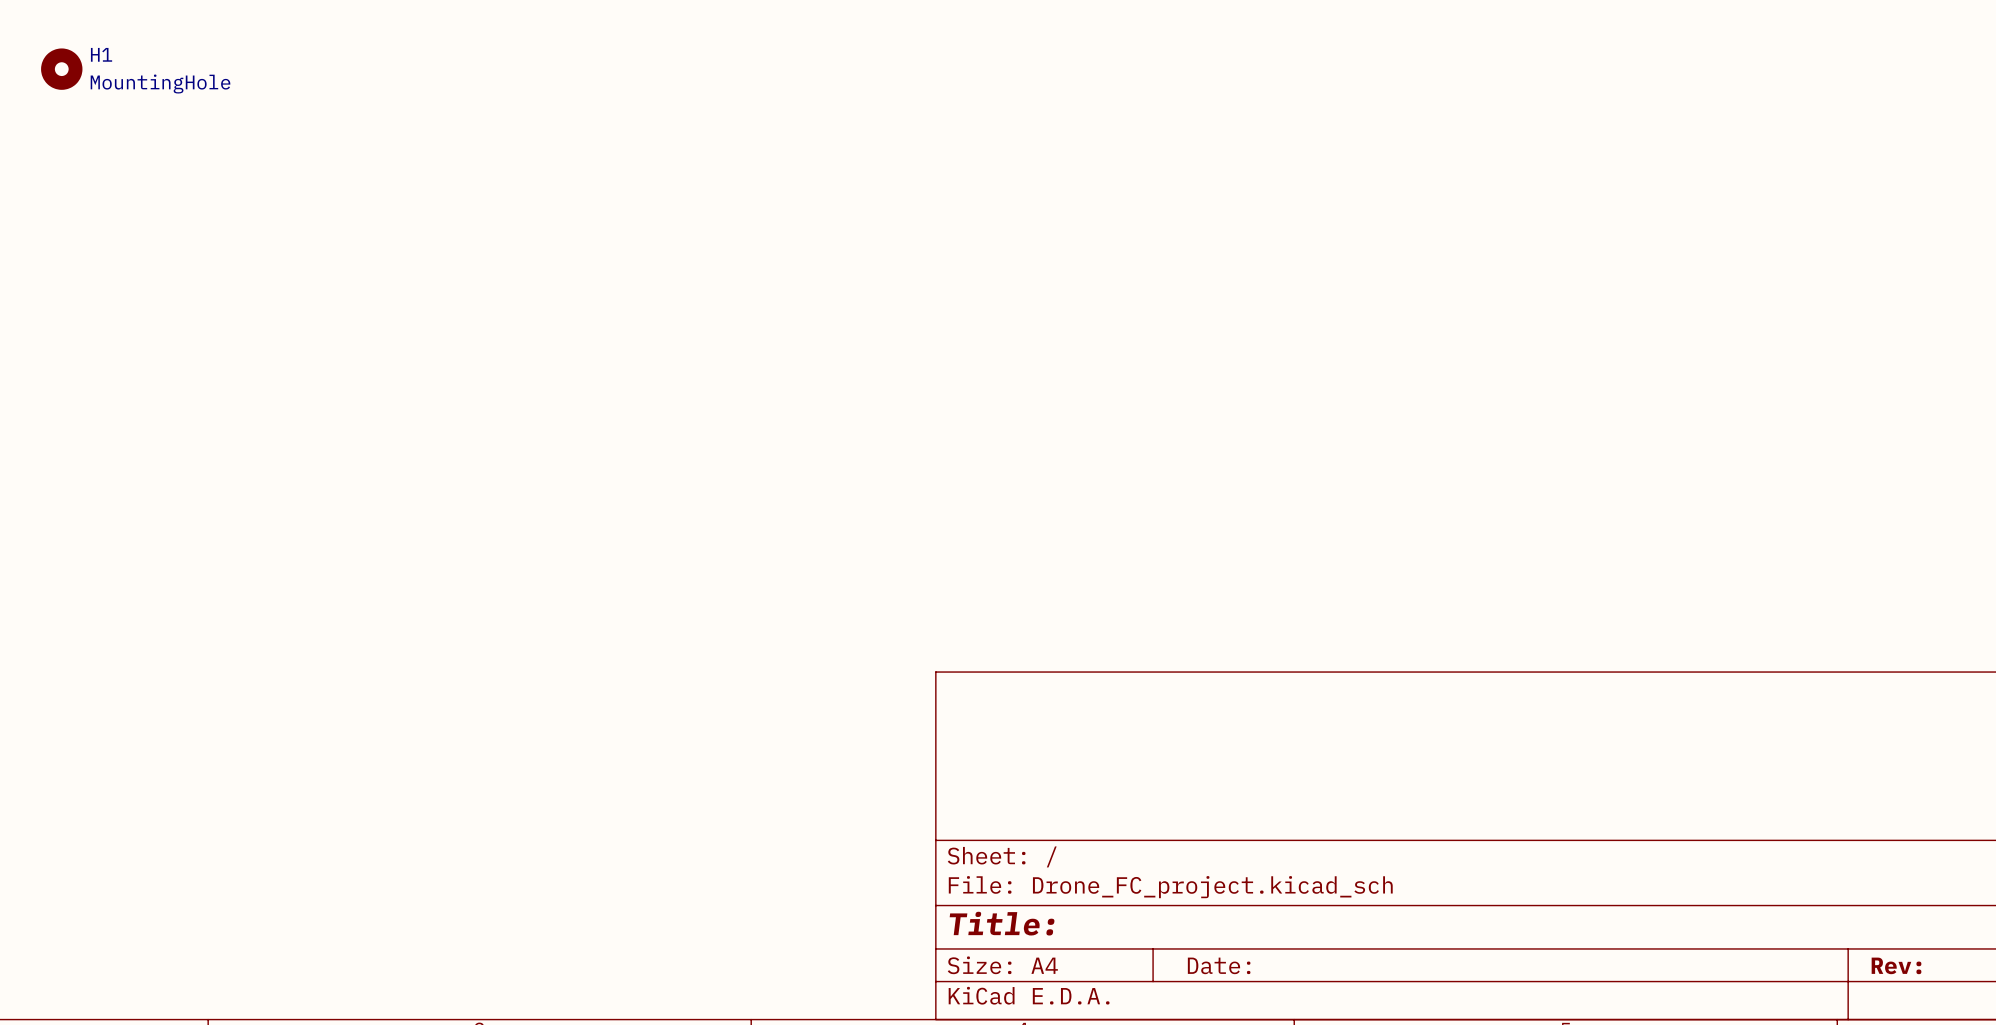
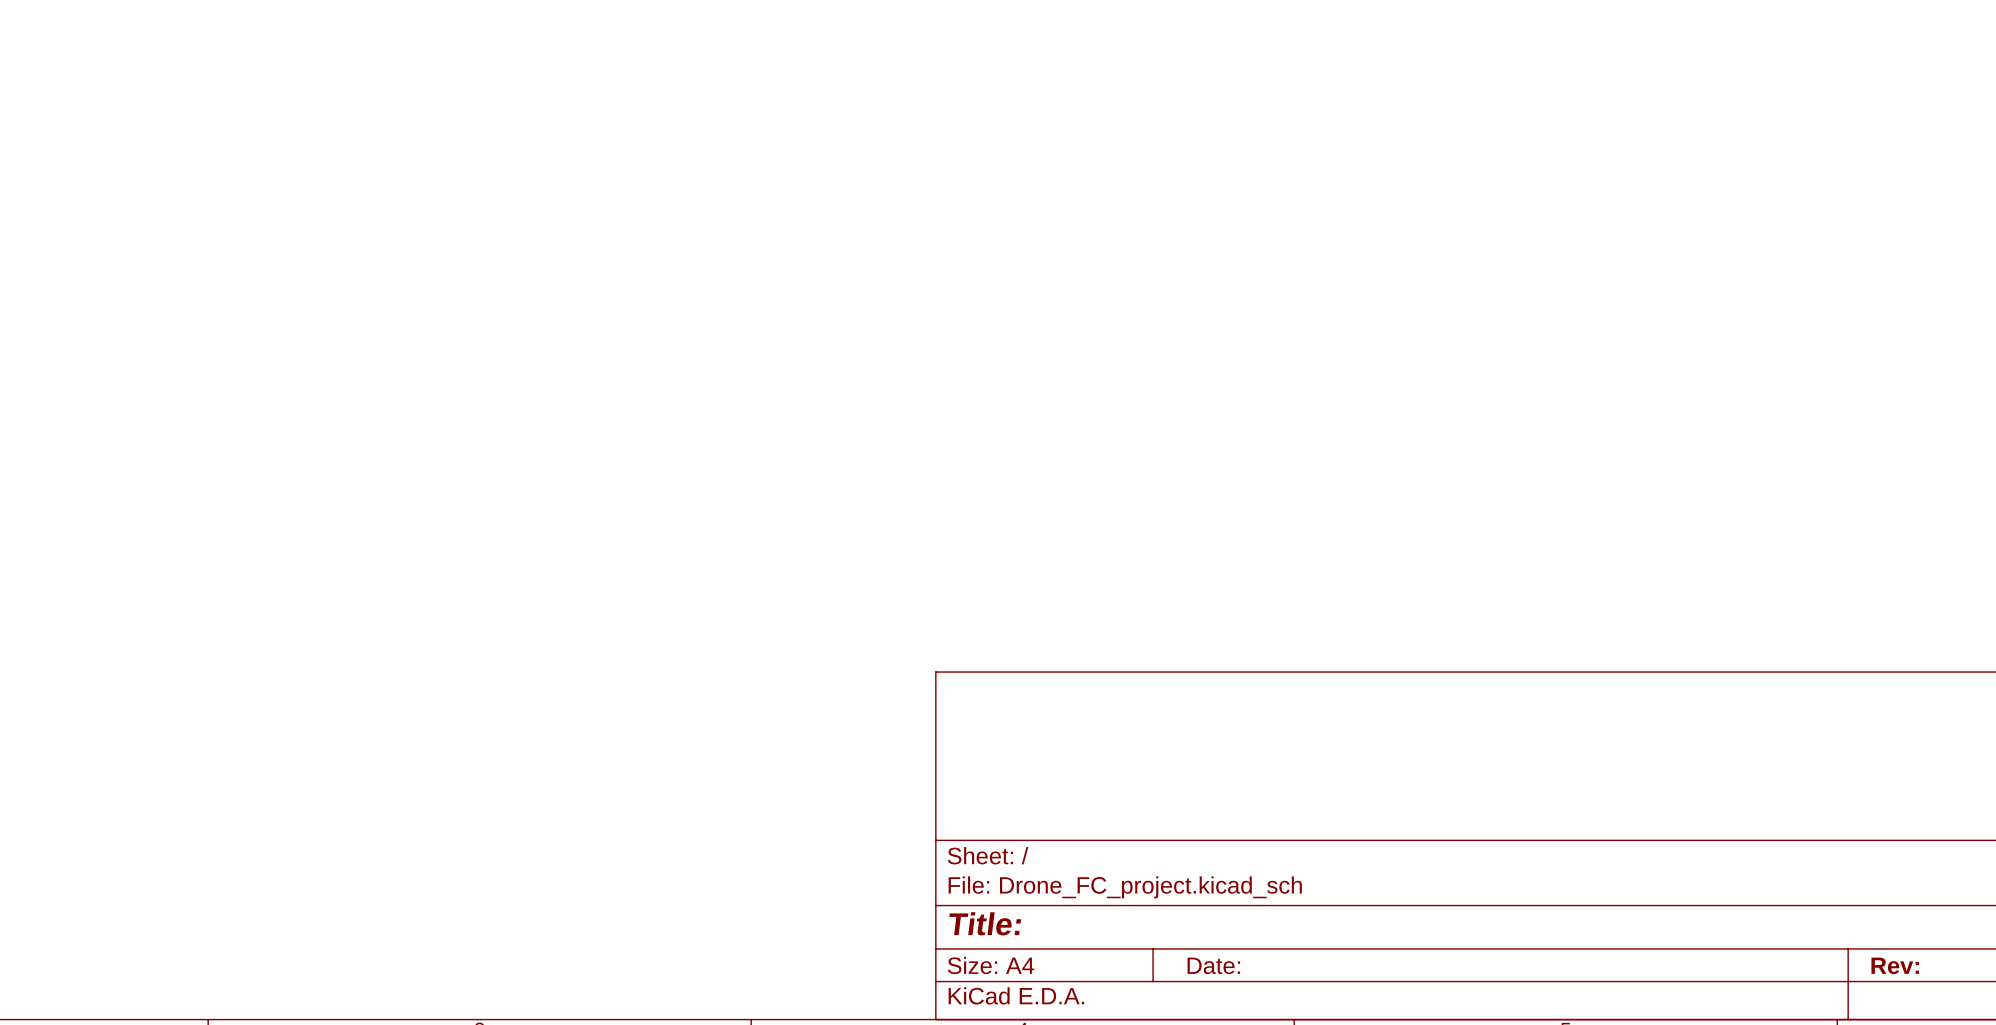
H1: MountingHole (61, 69) -> none

